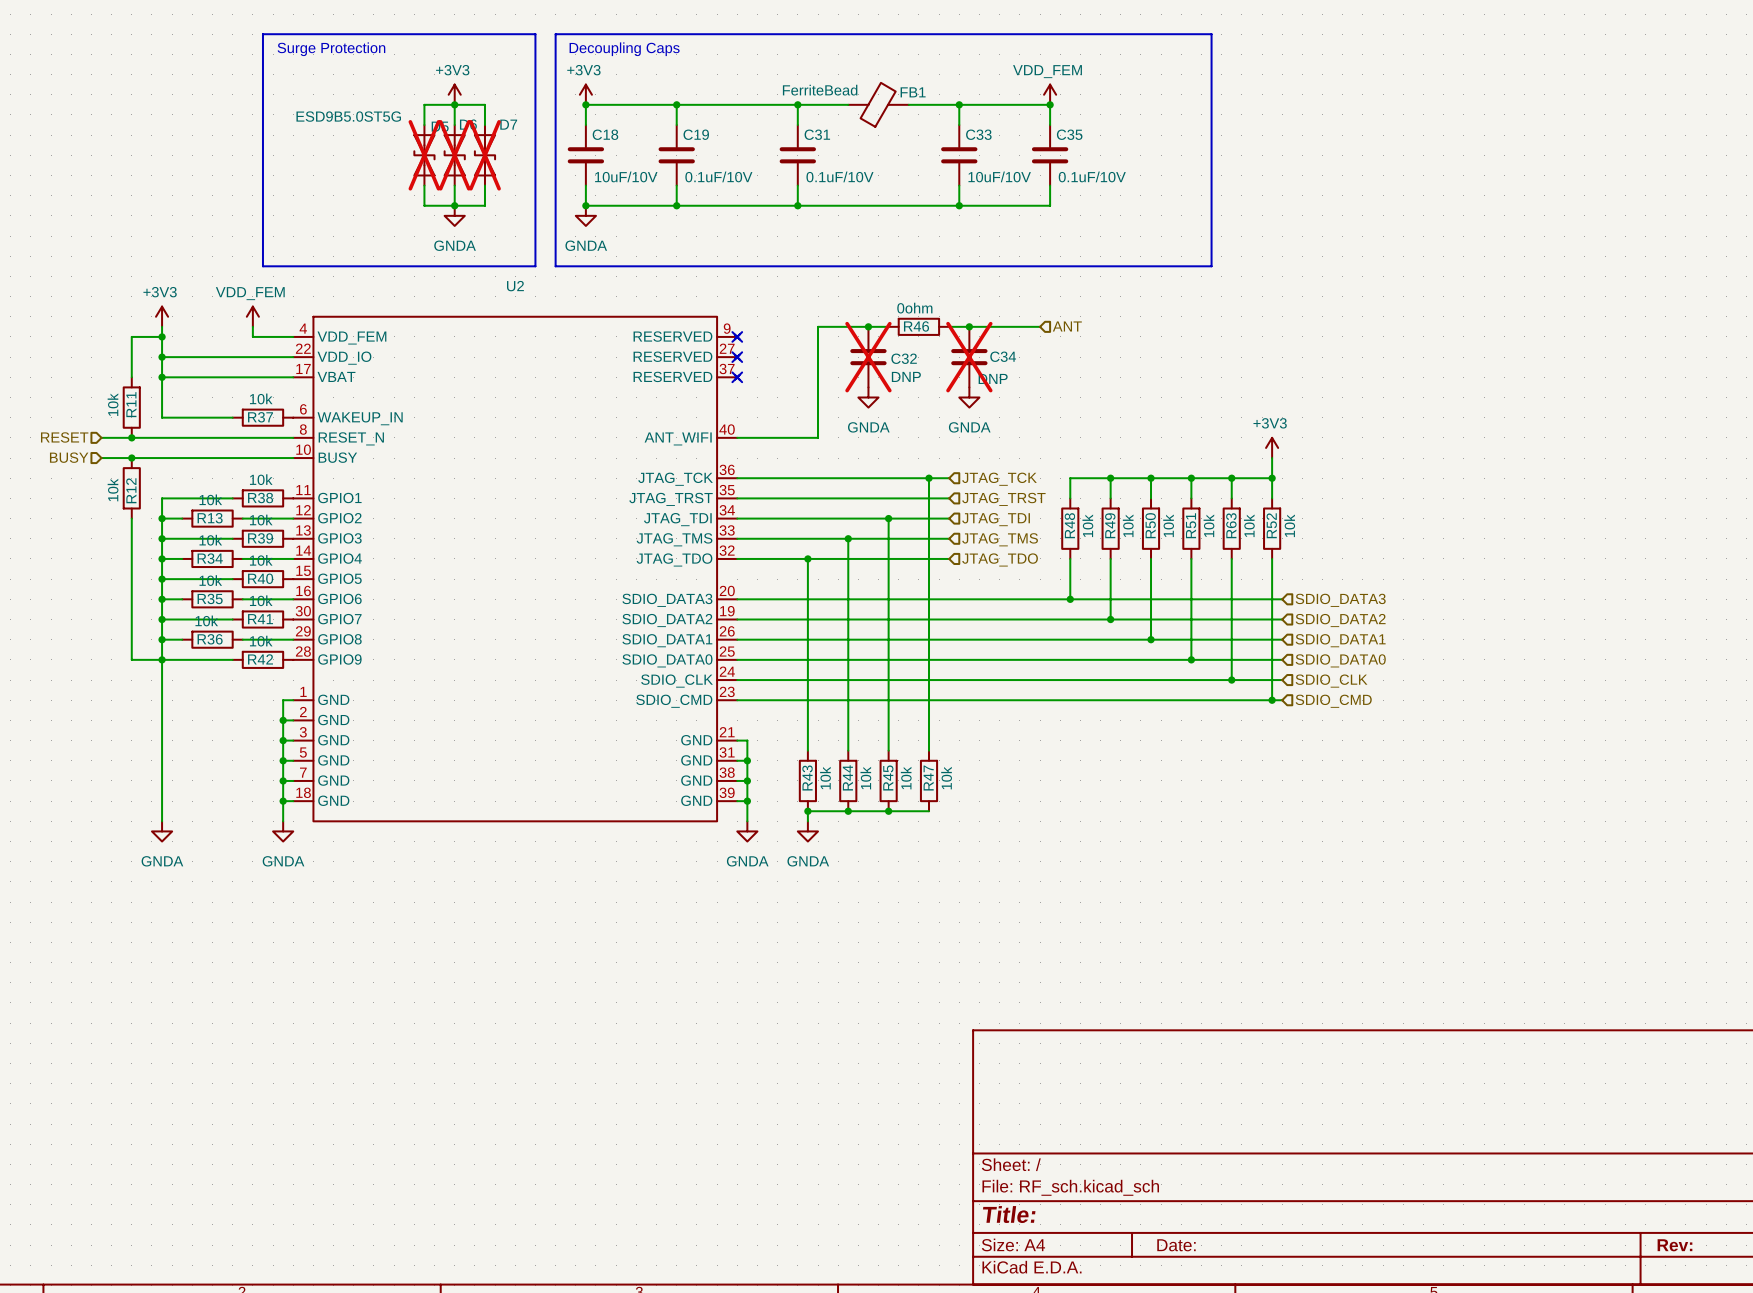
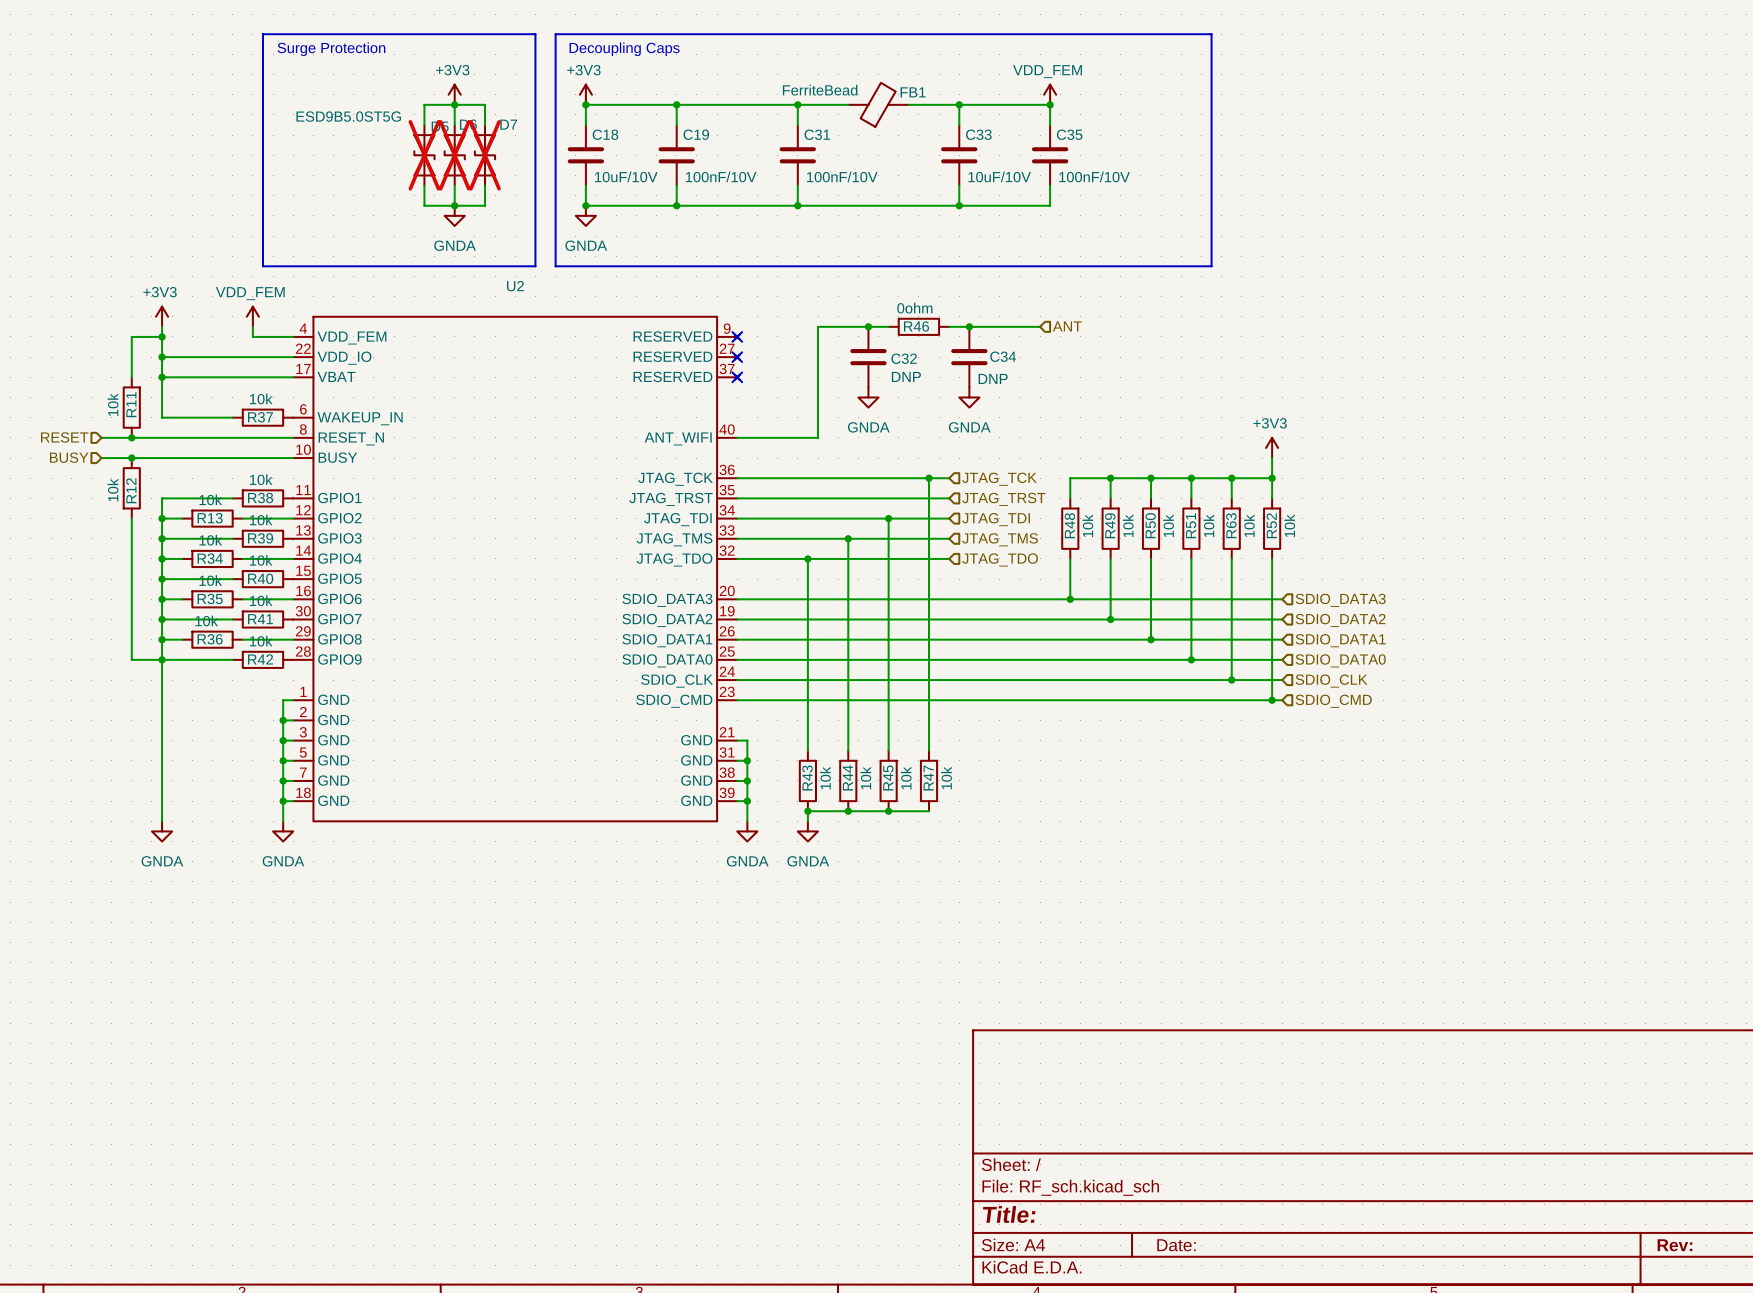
C19 value: 0.1uF/10V (718, 176) -> 100nF/10V (721, 176)
C31 value: 0.1uF/10V (839, 176) -> 100nF/10V (842, 176)
C35 value: 0.1uF/10V (1092, 176) -> 100nF/10V (1094, 176)
C32 do-not-place cross: (868, 357) -> none
C34 do-not-place cross: (969, 357) -> none

